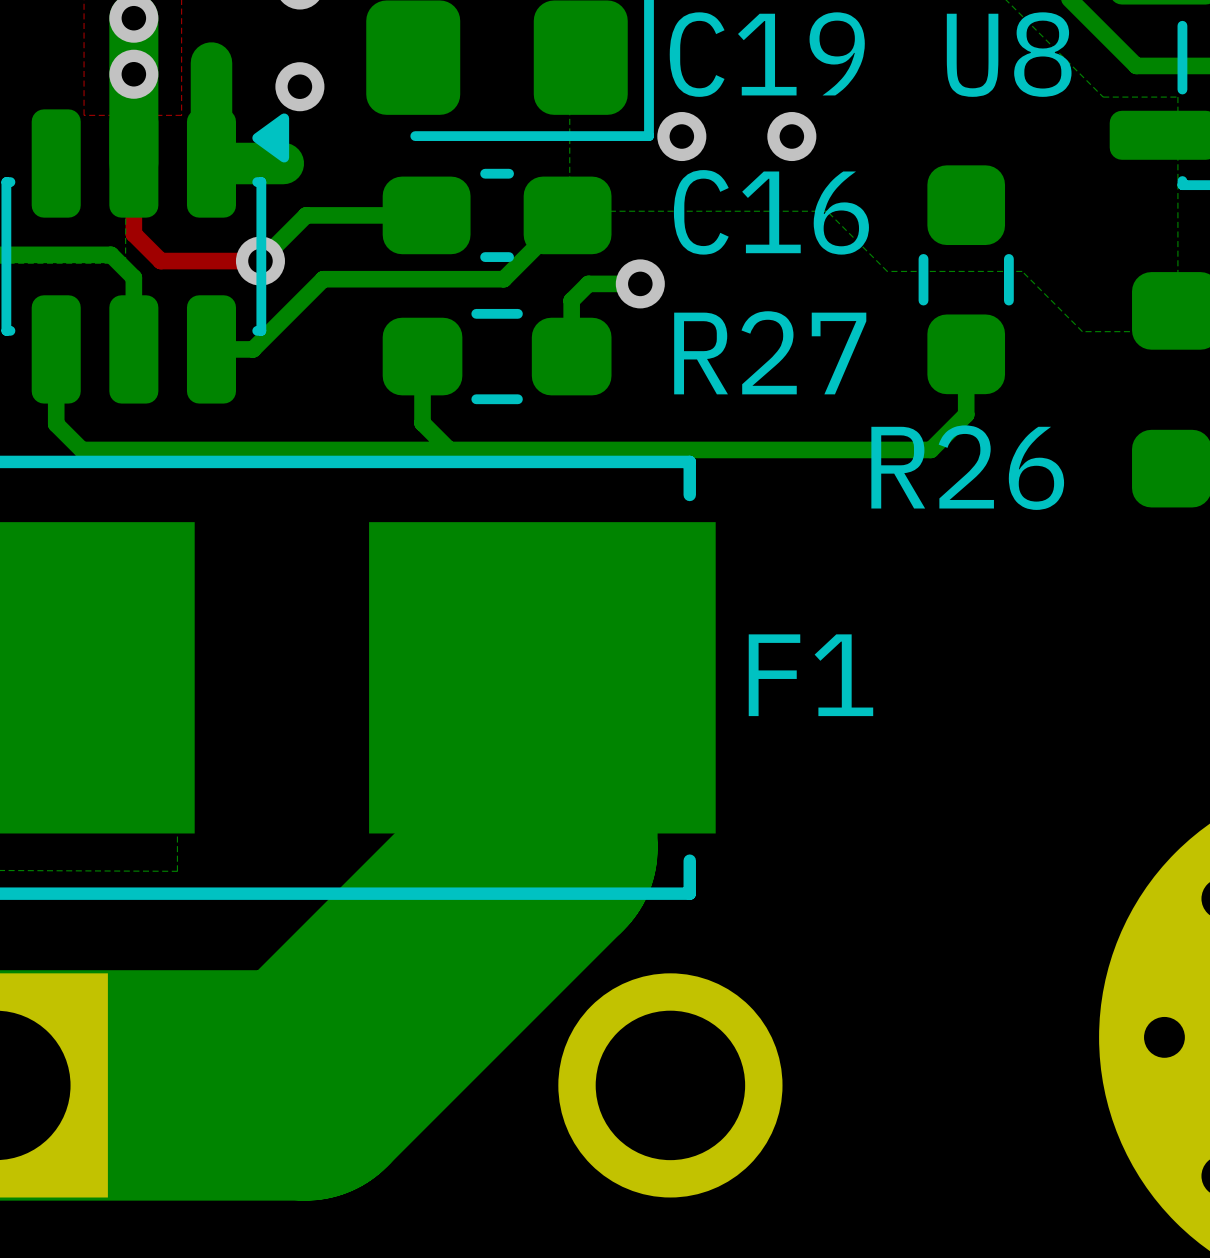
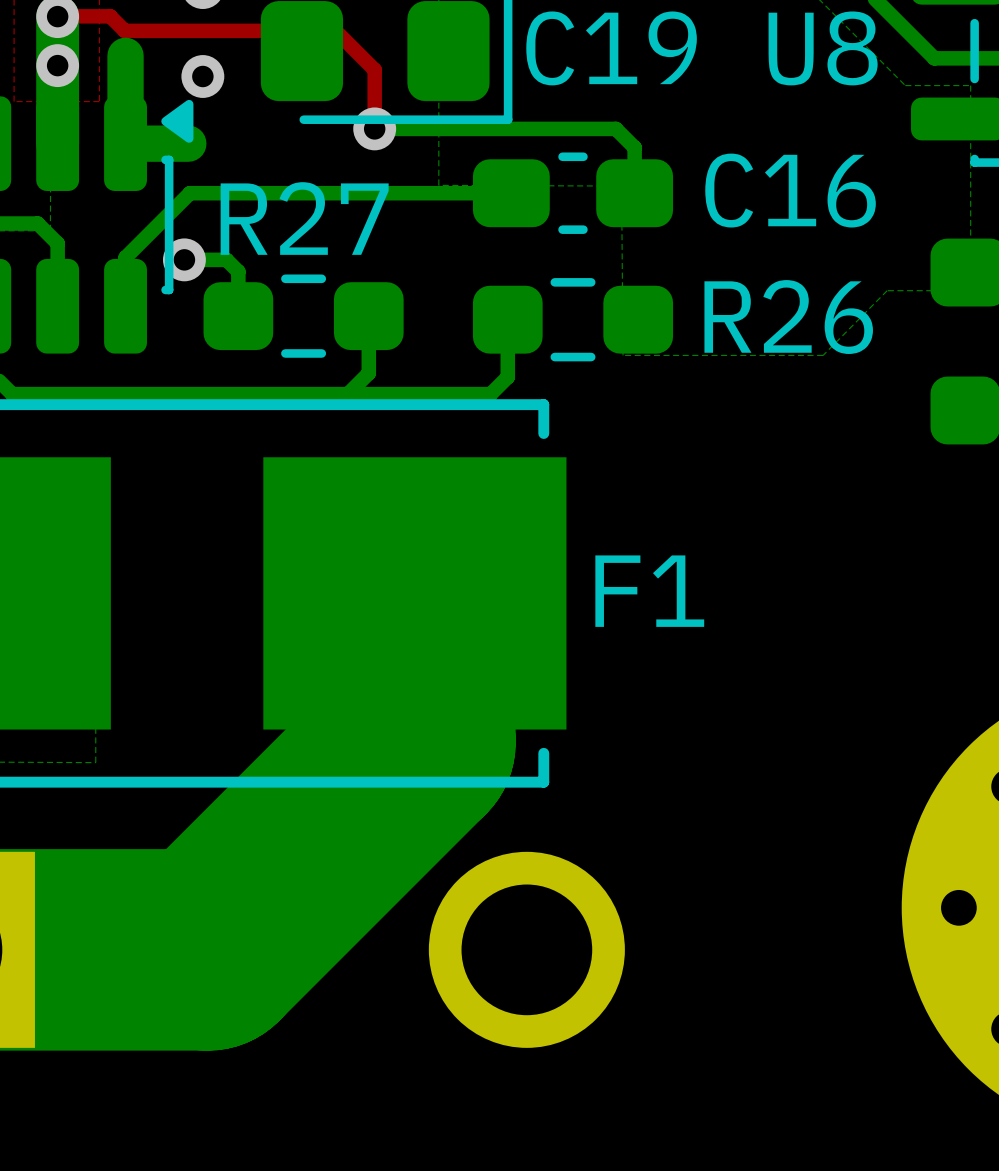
top track: none -> (57, 16) (110, 16) (124, 30) (335, 30) (374, 69) (374, 128)
top track: (133, 74) (133, 234) (160, 261) (260, 261) -> none
via: (681, 136) -> none
via: (791, 136) -> none
bottom track: none -> (374, 128) (615, 128) (634, 147) (634, 193)
via: none -> (374, 128)
bottom zone outline: (569, 211) (827, 211) (887, 271) (1022, 271) (1082, 331) -> (438, 185) (621, 186) (623, 355) (823, 355) (887, 290)
C16 name position: C16 (771, 212) -> C16 (790, 190)
bottom track: (426, 215) (306, 215) (260, 261) -> none
C16 position: (497, 215) -> (572, 193)
bottom track: (567, 215) (503, 279) (323, 279) (253, 349) (211, 349) -> (511, 193) (189, 193) (125, 257) (125, 306)
via position: (260, 261) -> (184, 259)
R26 rotation: 0° (966, 279) -> 90° clockwise (572, 319)
R26 position: (966, 279) -> (572, 319)
bottom track: (640, 283) (588, 283) (571, 300) (571, 356) -> none
via: (640, 283) -> none
bottom track: none -> (184, 259) (226, 259) (238, 271) (238, 316)
R27 name position: R27 (770, 352) -> R27 (304, 218)
bottom track: (966, 354) (966, 414) (930, 449) (629, 449) -> (507, 319) (507, 377) (490, 394)
bottom track: (422, 356) (422, 423) (449, 449) -> none
R27 position: (497, 356) -> (303, 316)
bottom track: none -> (368, 316) (368, 373) (347, 394)
R26 name position: R26 (967, 467) -> R26 (788, 317)

